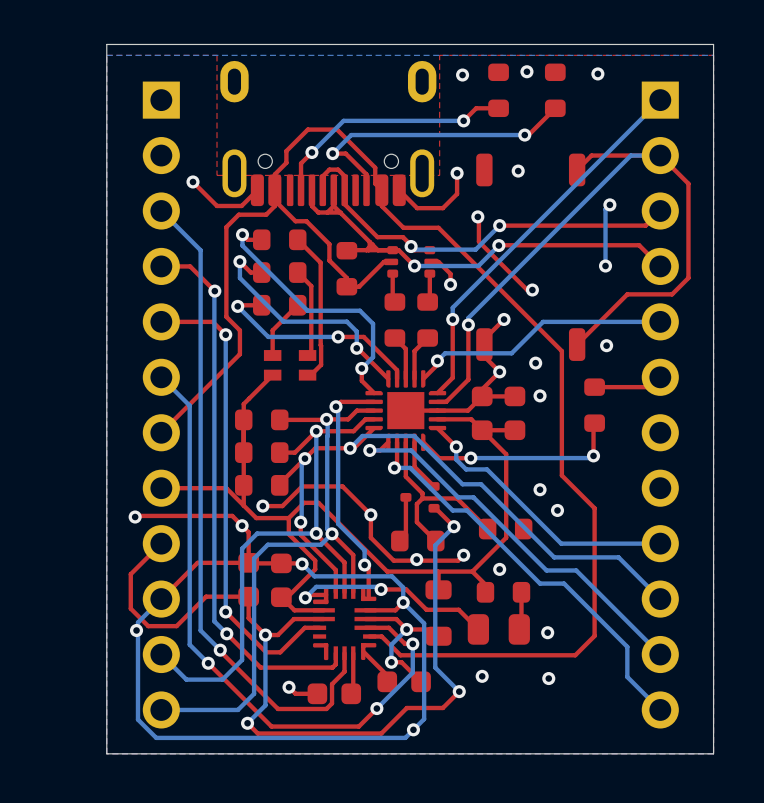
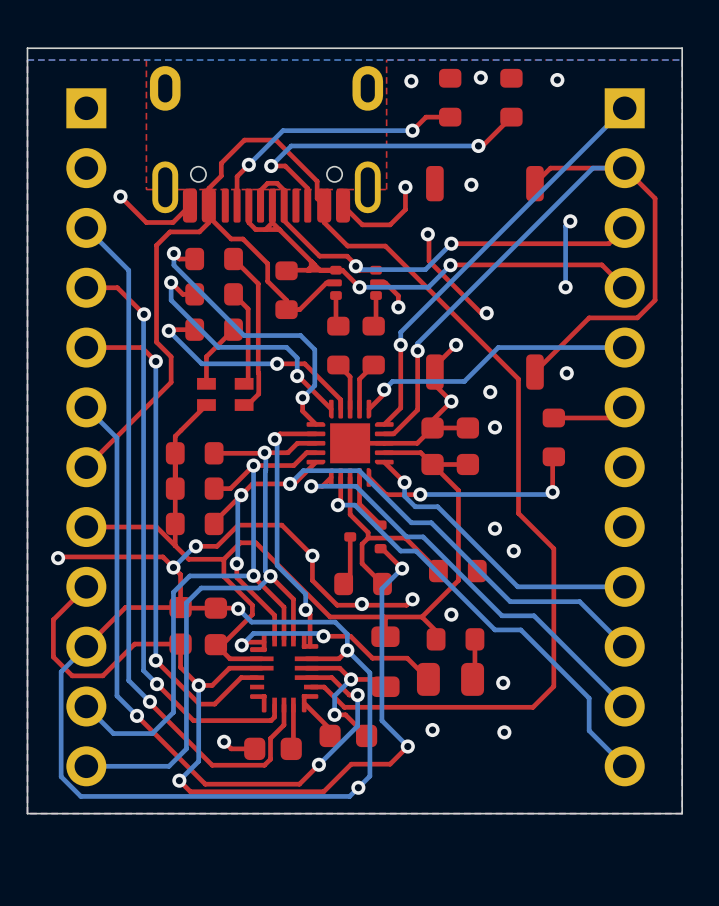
bottom track: none -> (195, 546) (173, 567)
via: (136, 630) -> none

